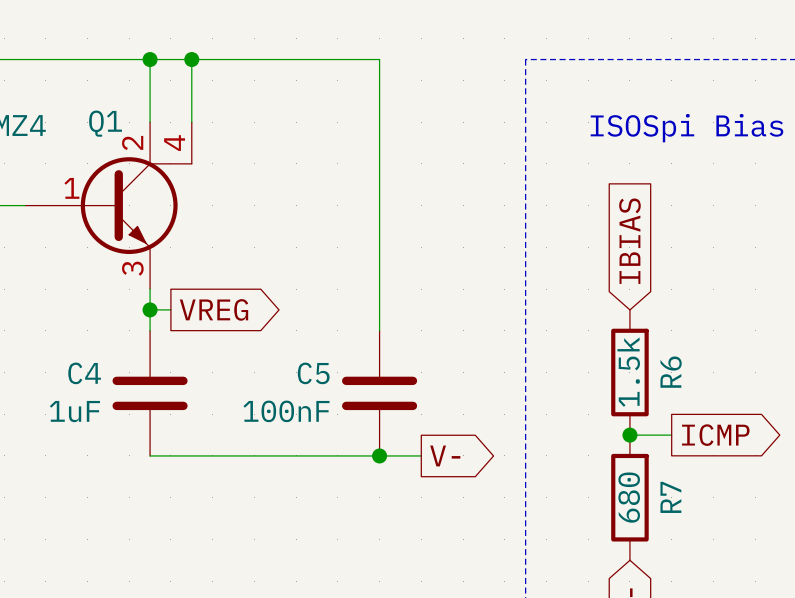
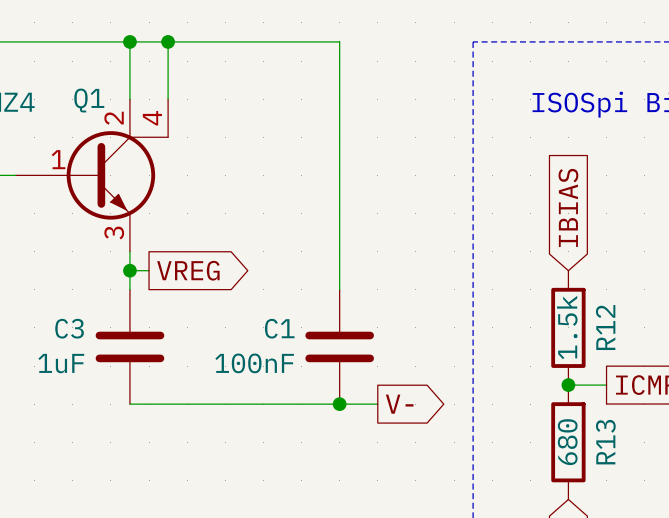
R6 name: R6 (671, 372) -> R12 (605, 327)
C4 name: C4 (84, 373) -> C3 (69, 328)
C5 name: C5 (313, 373) -> C1 (279, 328)
R7 name: R7 (670, 497) -> R13 (605, 442)

